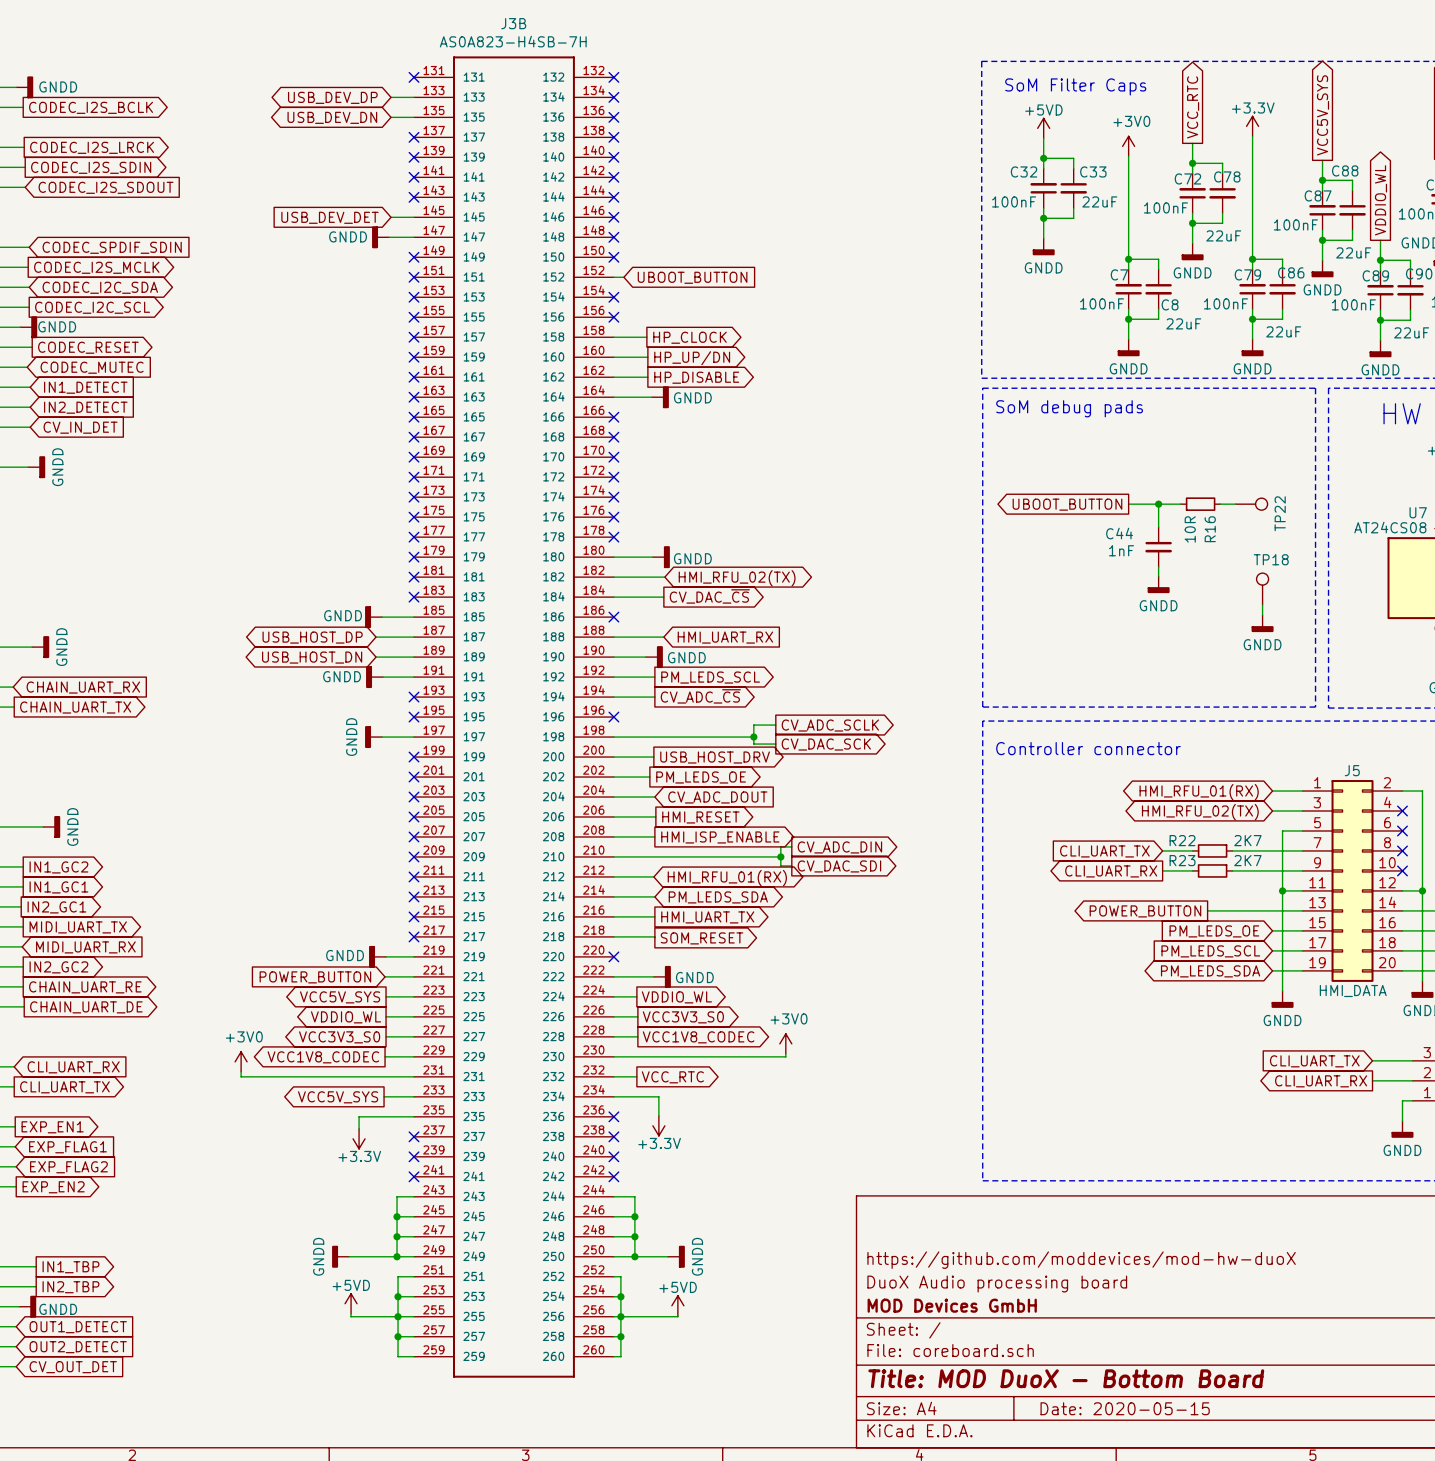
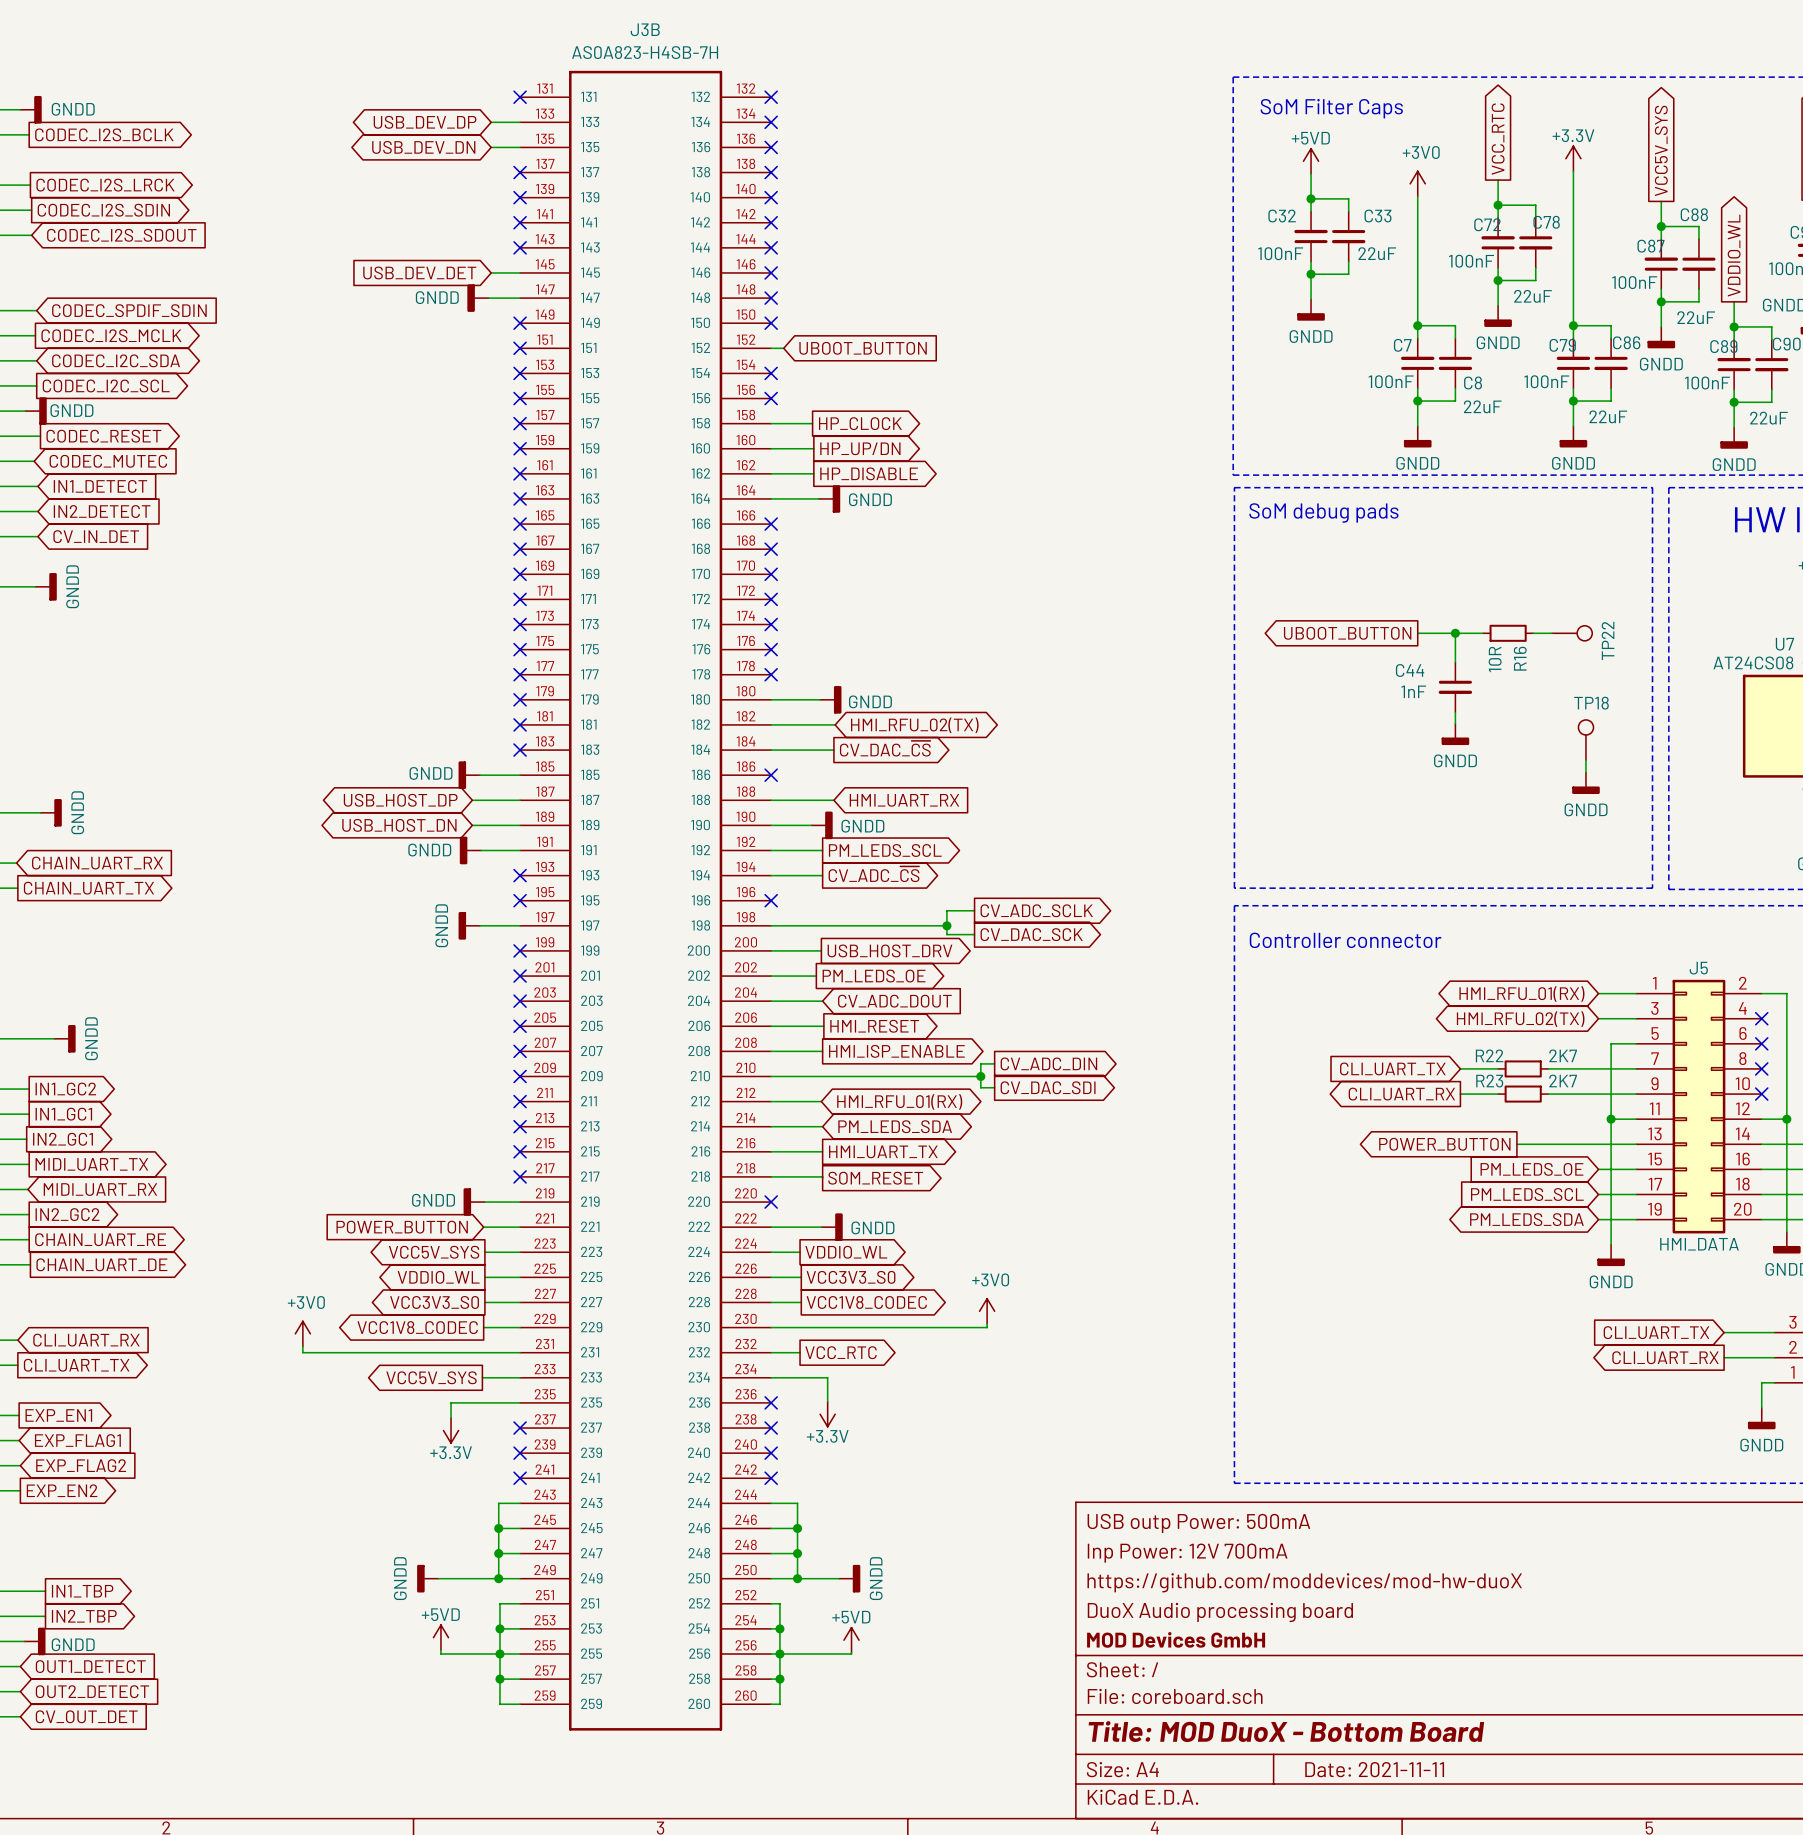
title block: none -> USB outp Power: 500mA (1198, 1523)
title block: none -> Inp Power: 12V 700mA (1187, 1553)
title block: Date: 2020-05-15 (1125, 1408) -> Date: 2021-11-11 (1374, 1769)

